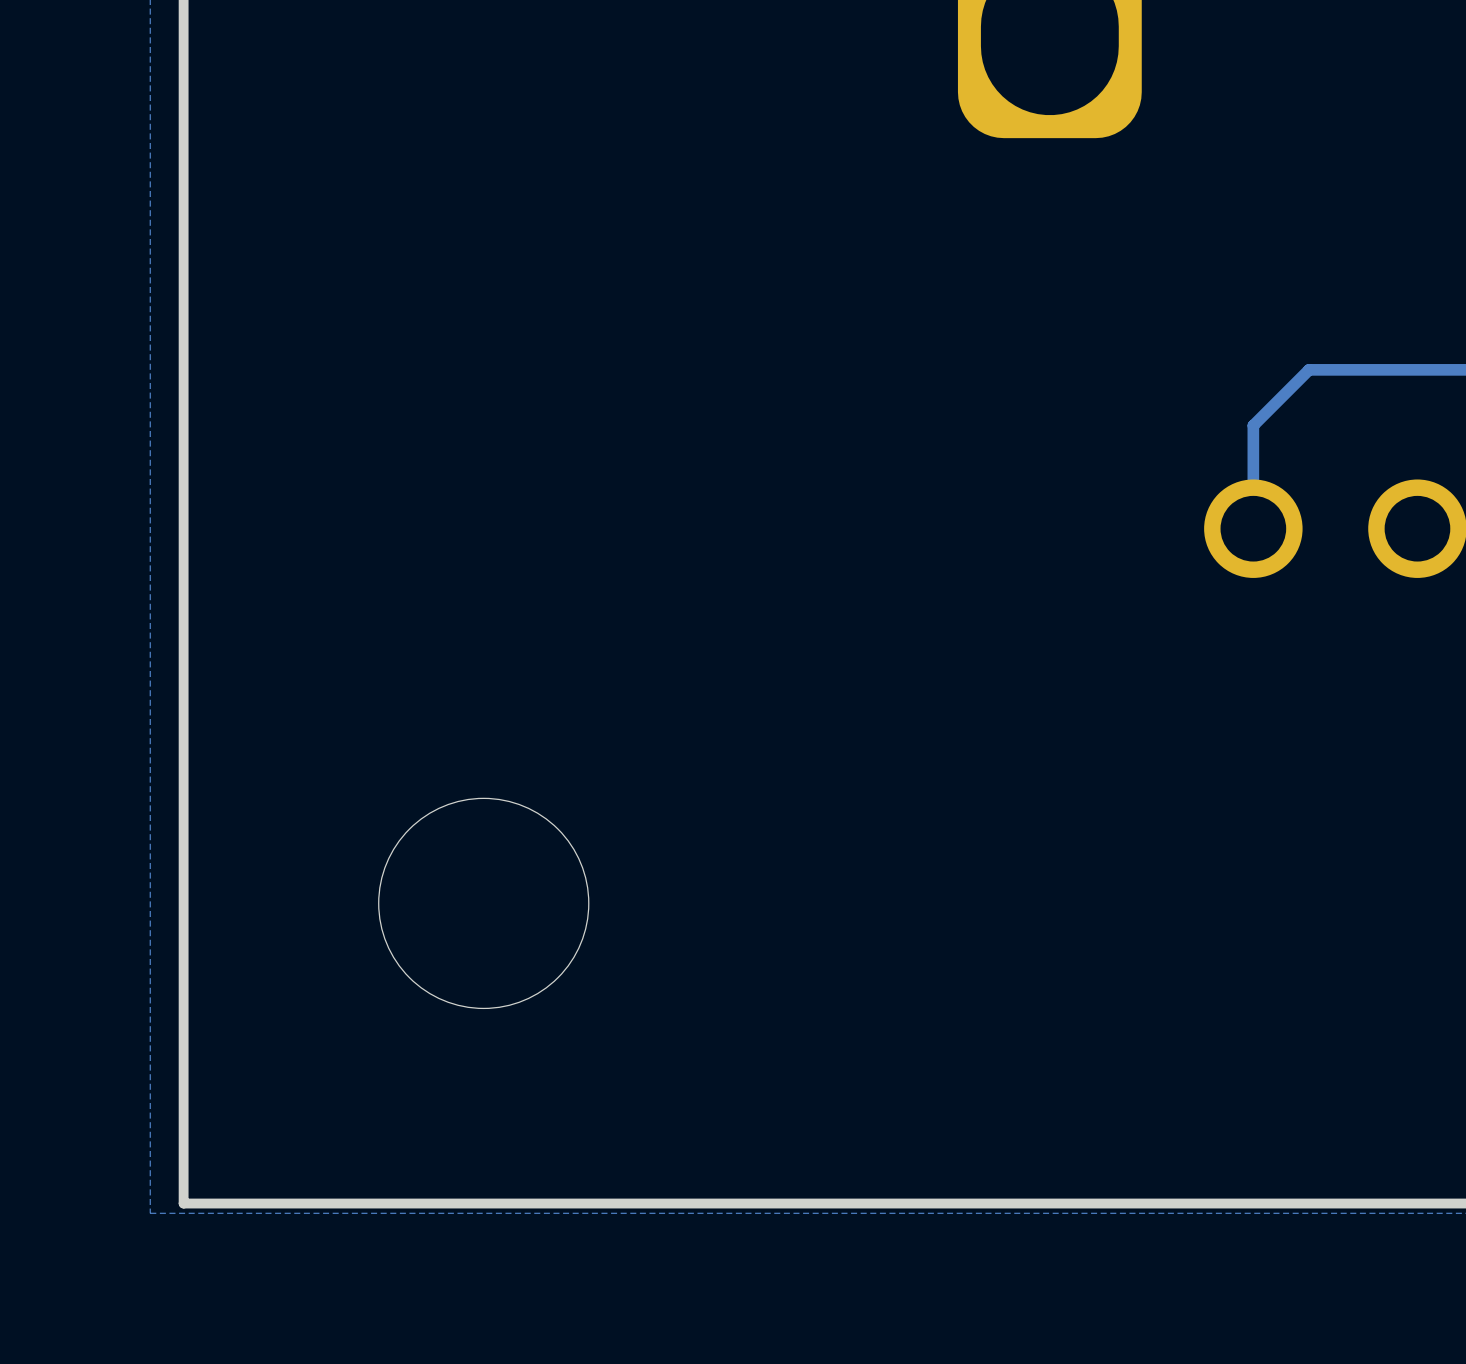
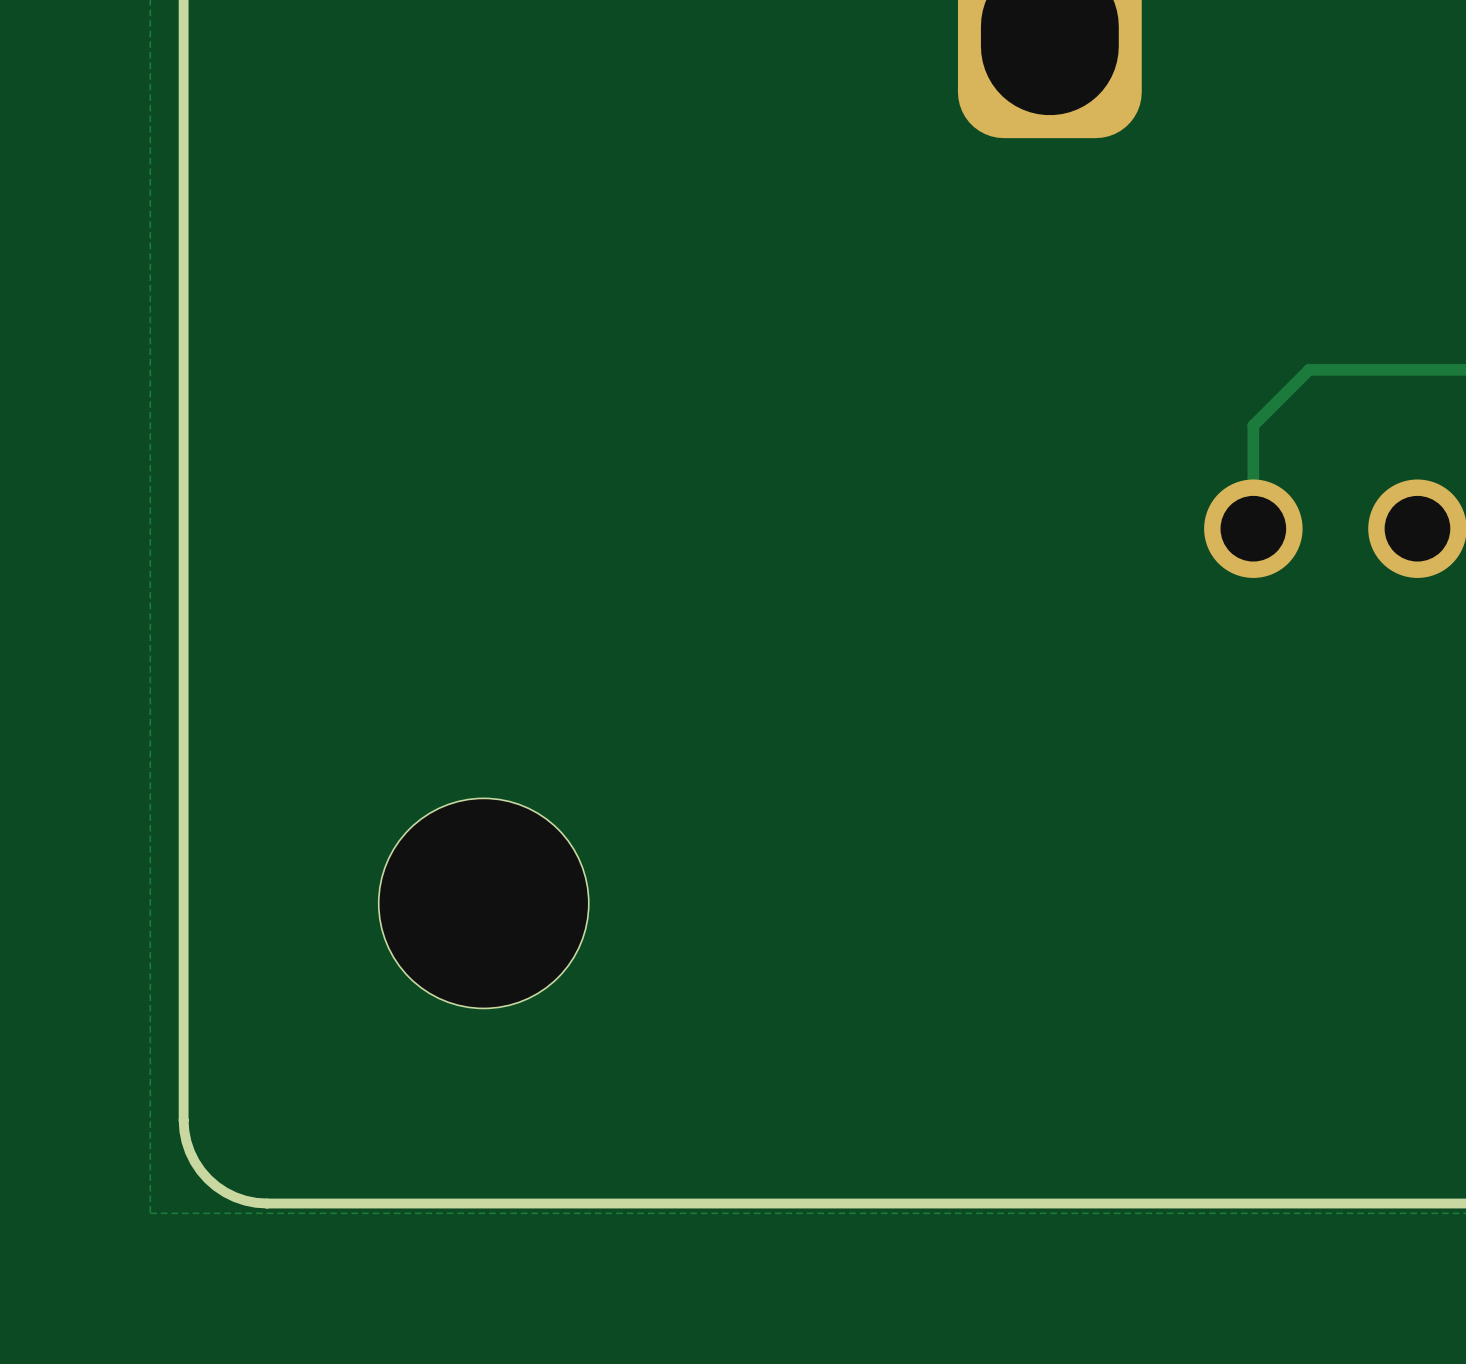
board edge: (183, 1120) (183, 1203) (266, 1203) -> (183, 1120) (189, 1152) (208, 1179) (235, 1197) (266, 1203)

